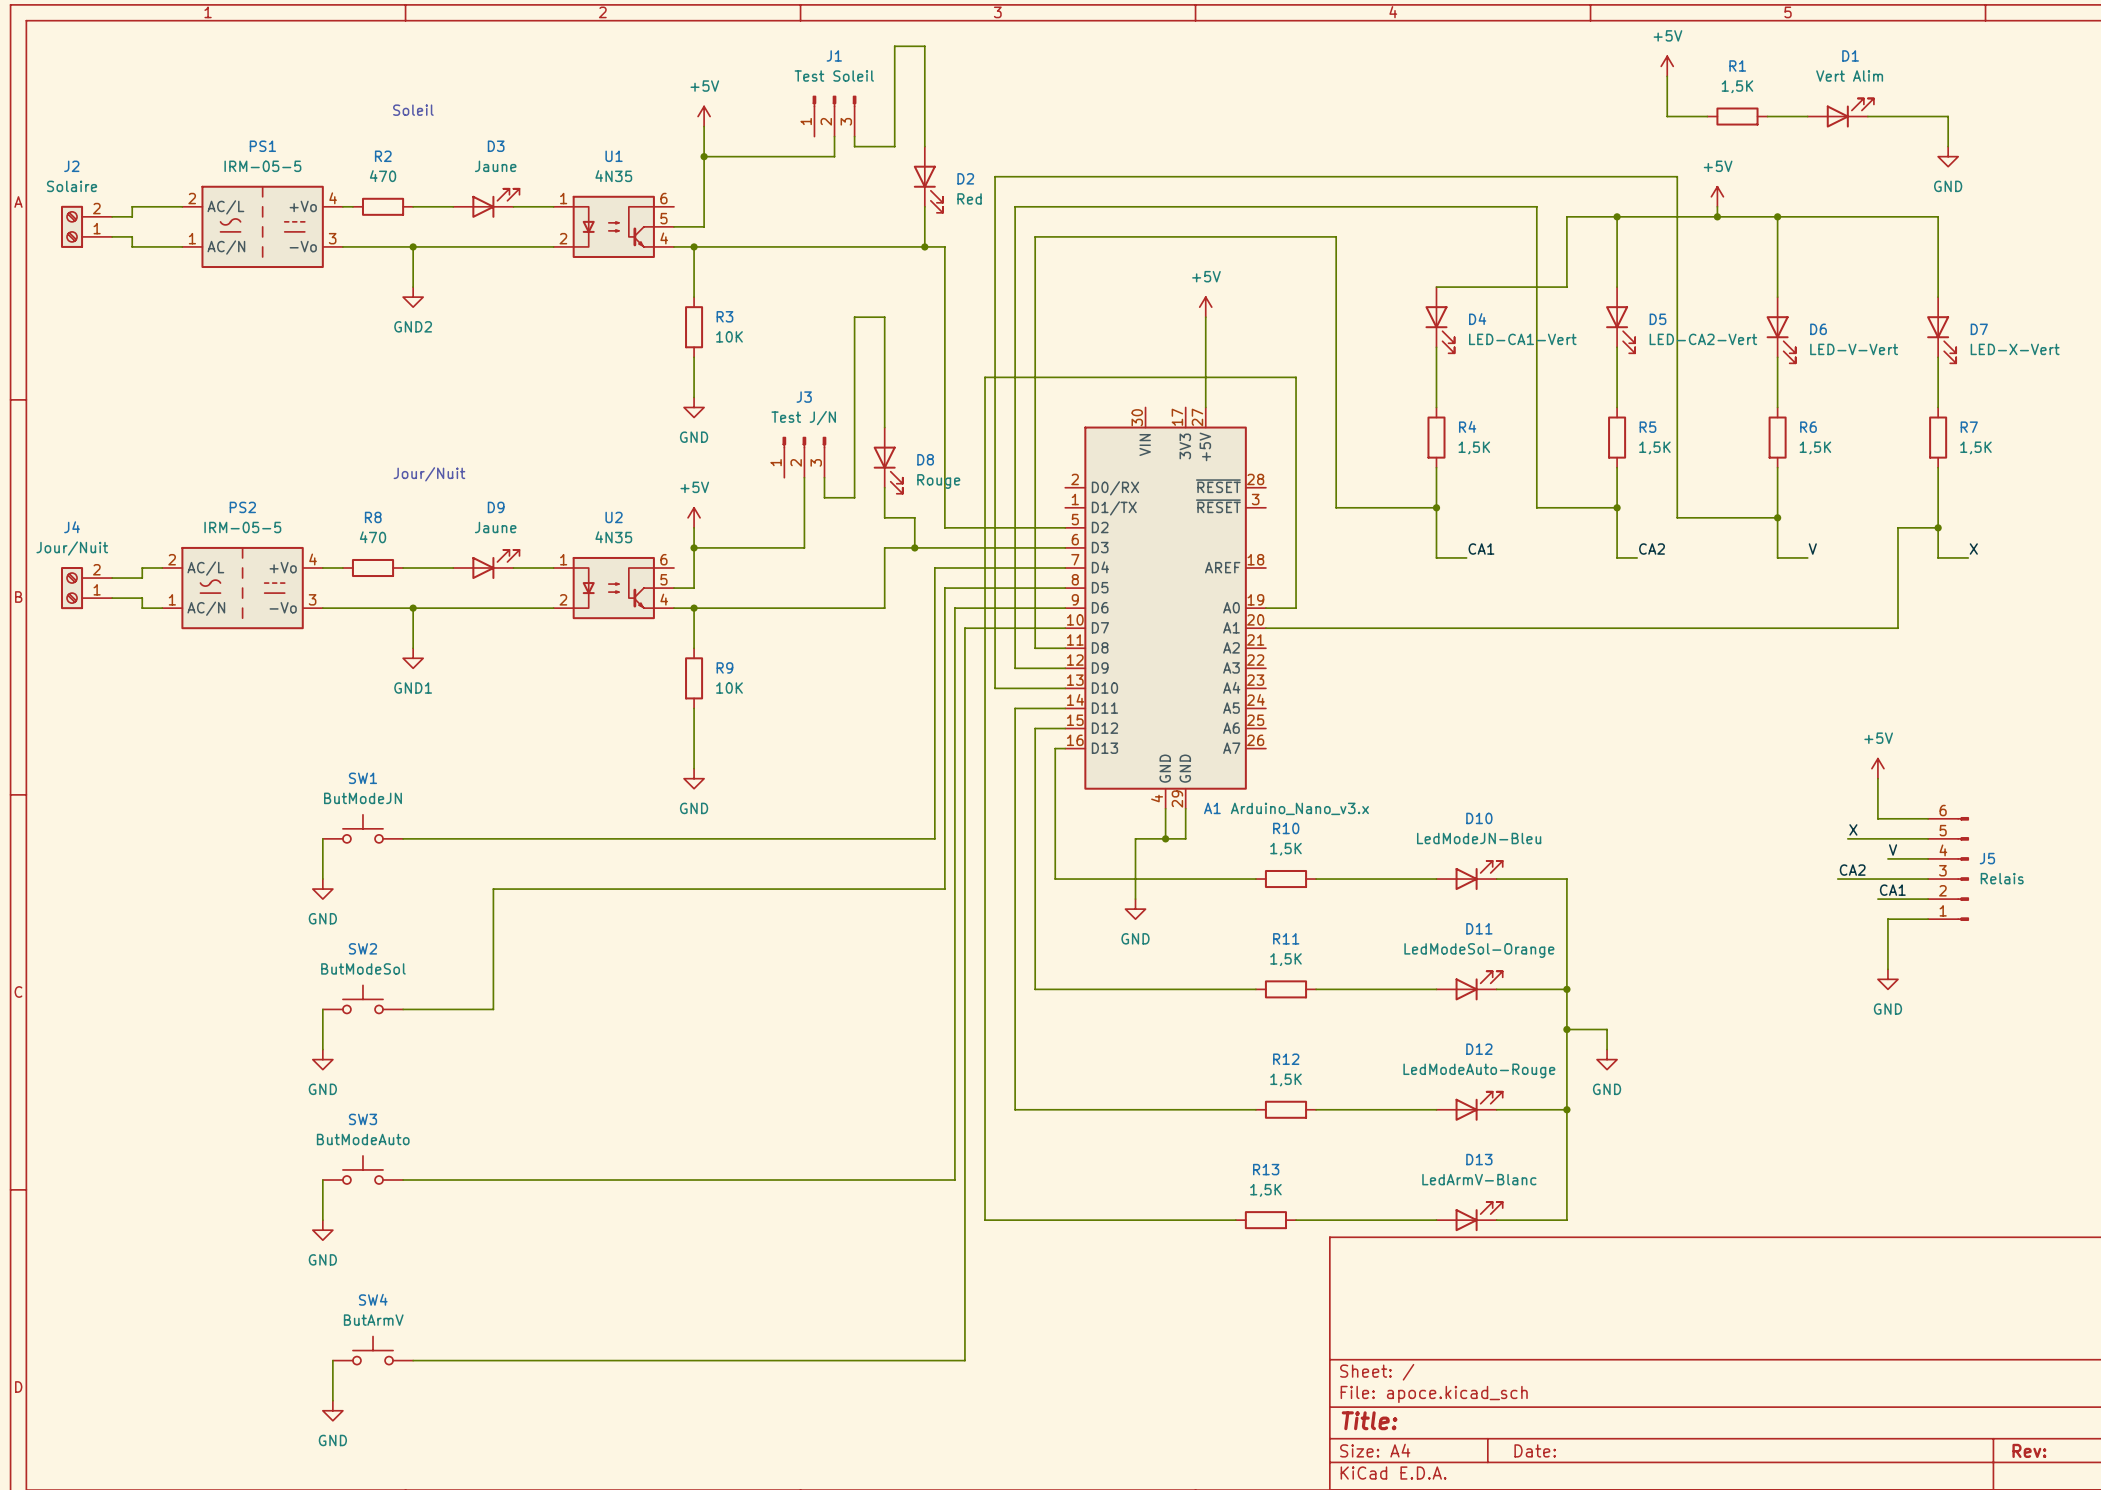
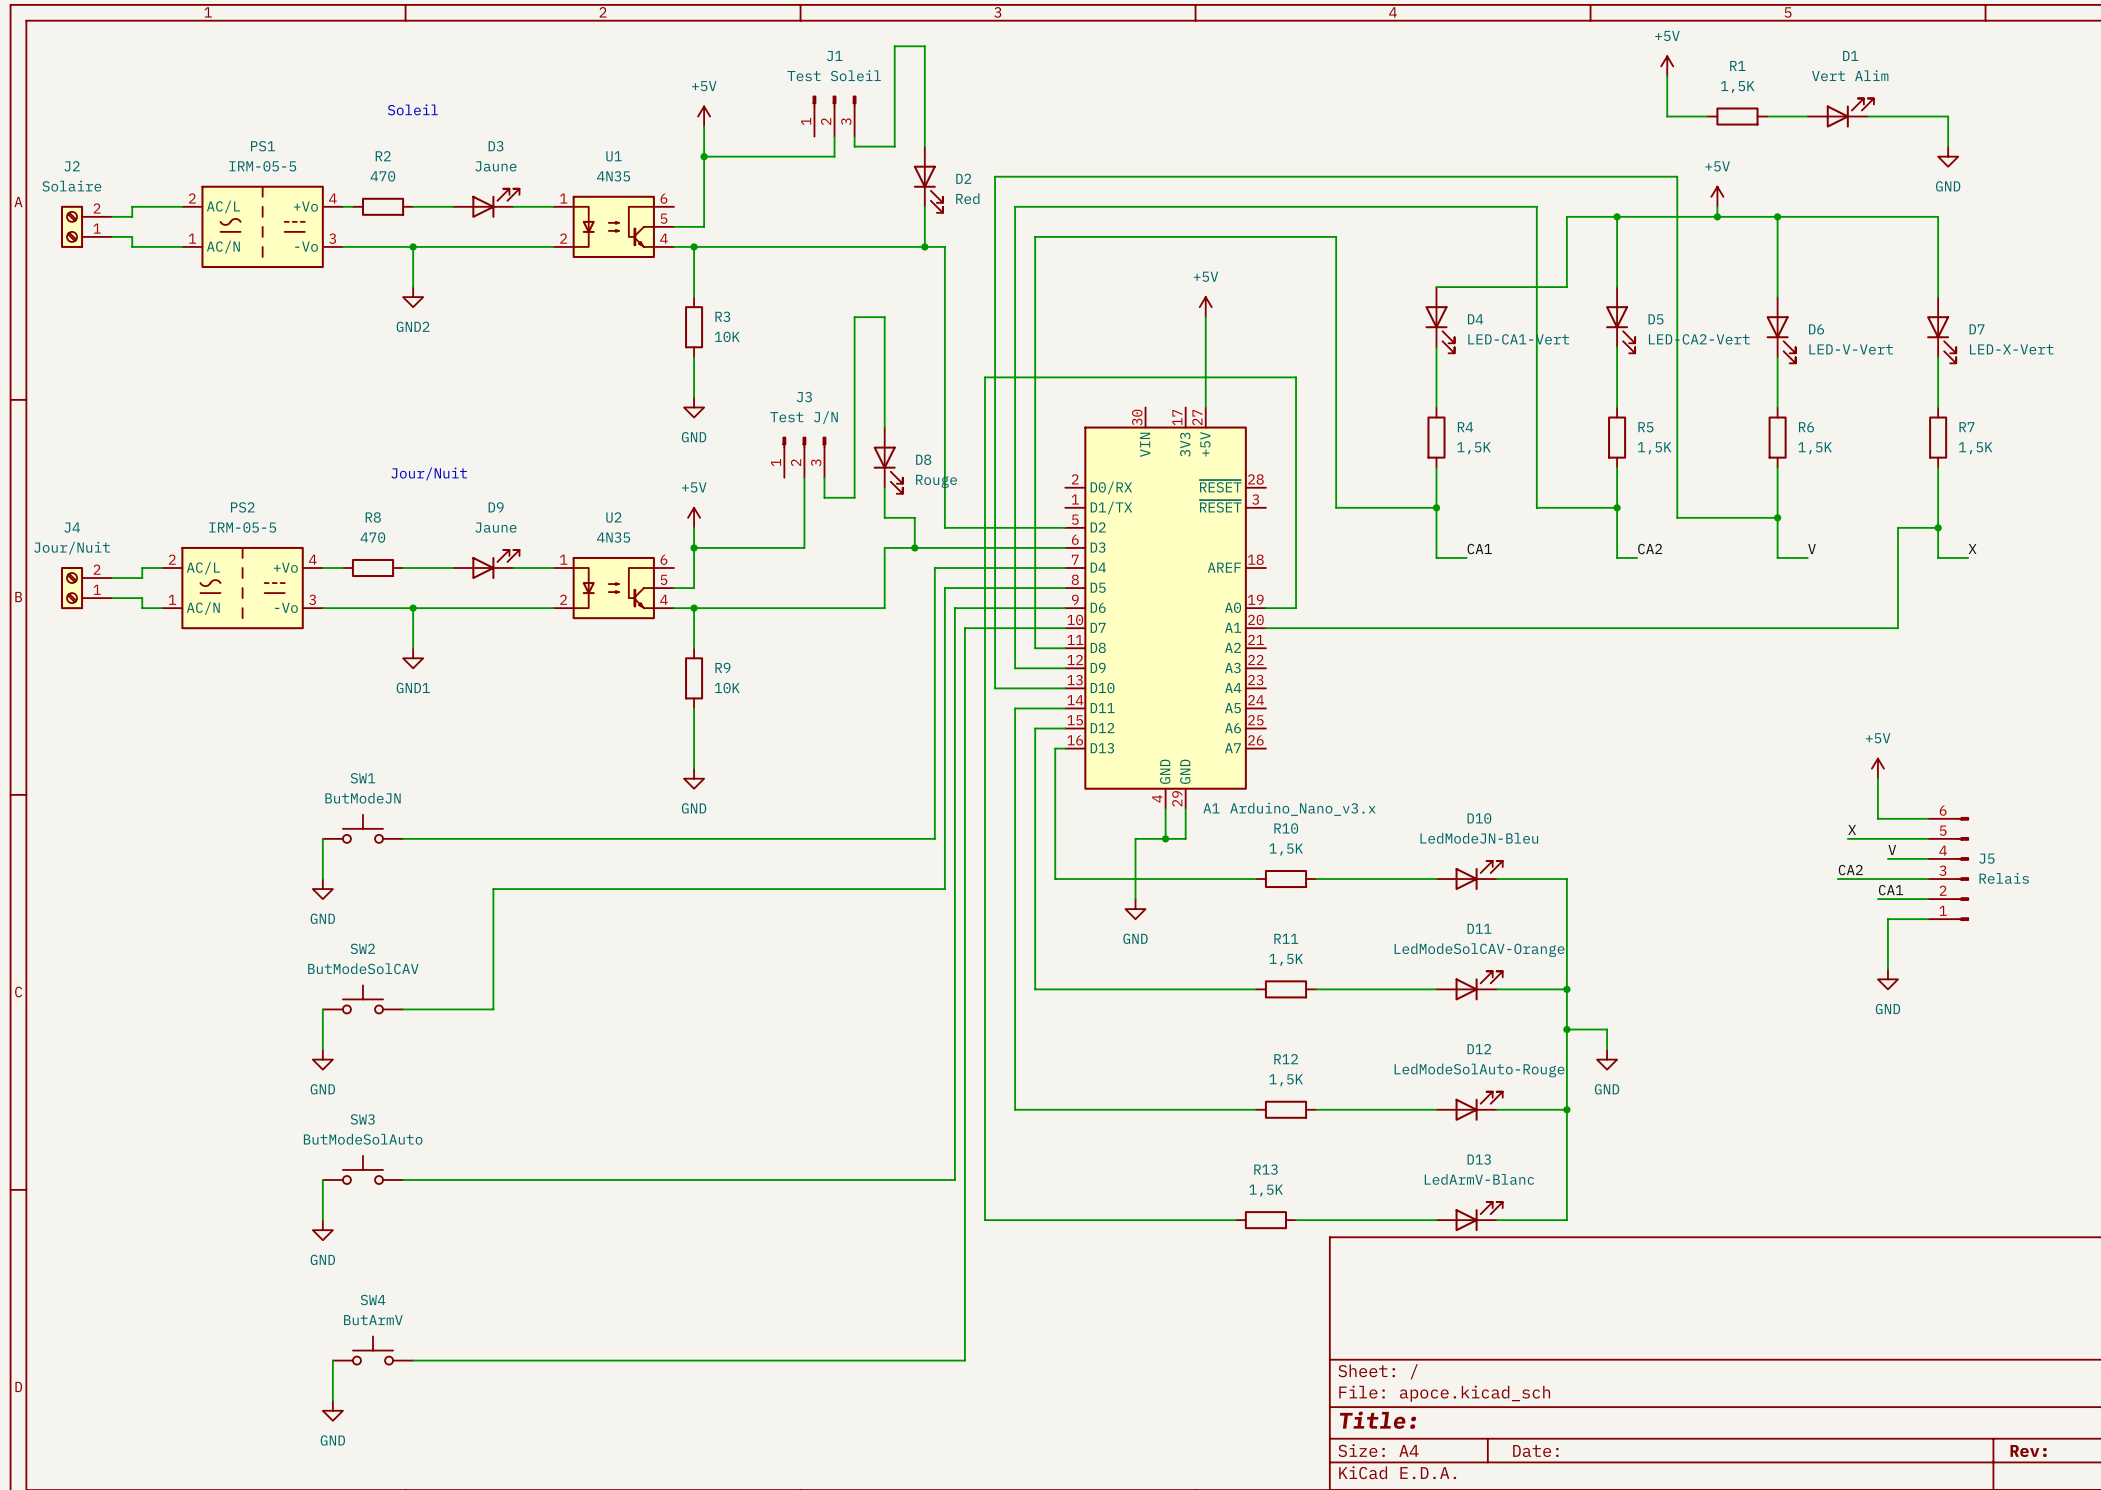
D11 value: LedModeSol-Orange (1479, 950) -> LedModeSolCAV-Orange (1479, 950)
SW2 value: ButModeSol (363, 968) -> ButModeSolCAV (363, 968)
D12 value: LedModeAuto-Rouge (1479, 1070) -> LedModeSolAuto-Rouge (1479, 1070)
SW3 value: ButModeAuto (363, 1139) -> ButModeSolAuto (363, 1139)

